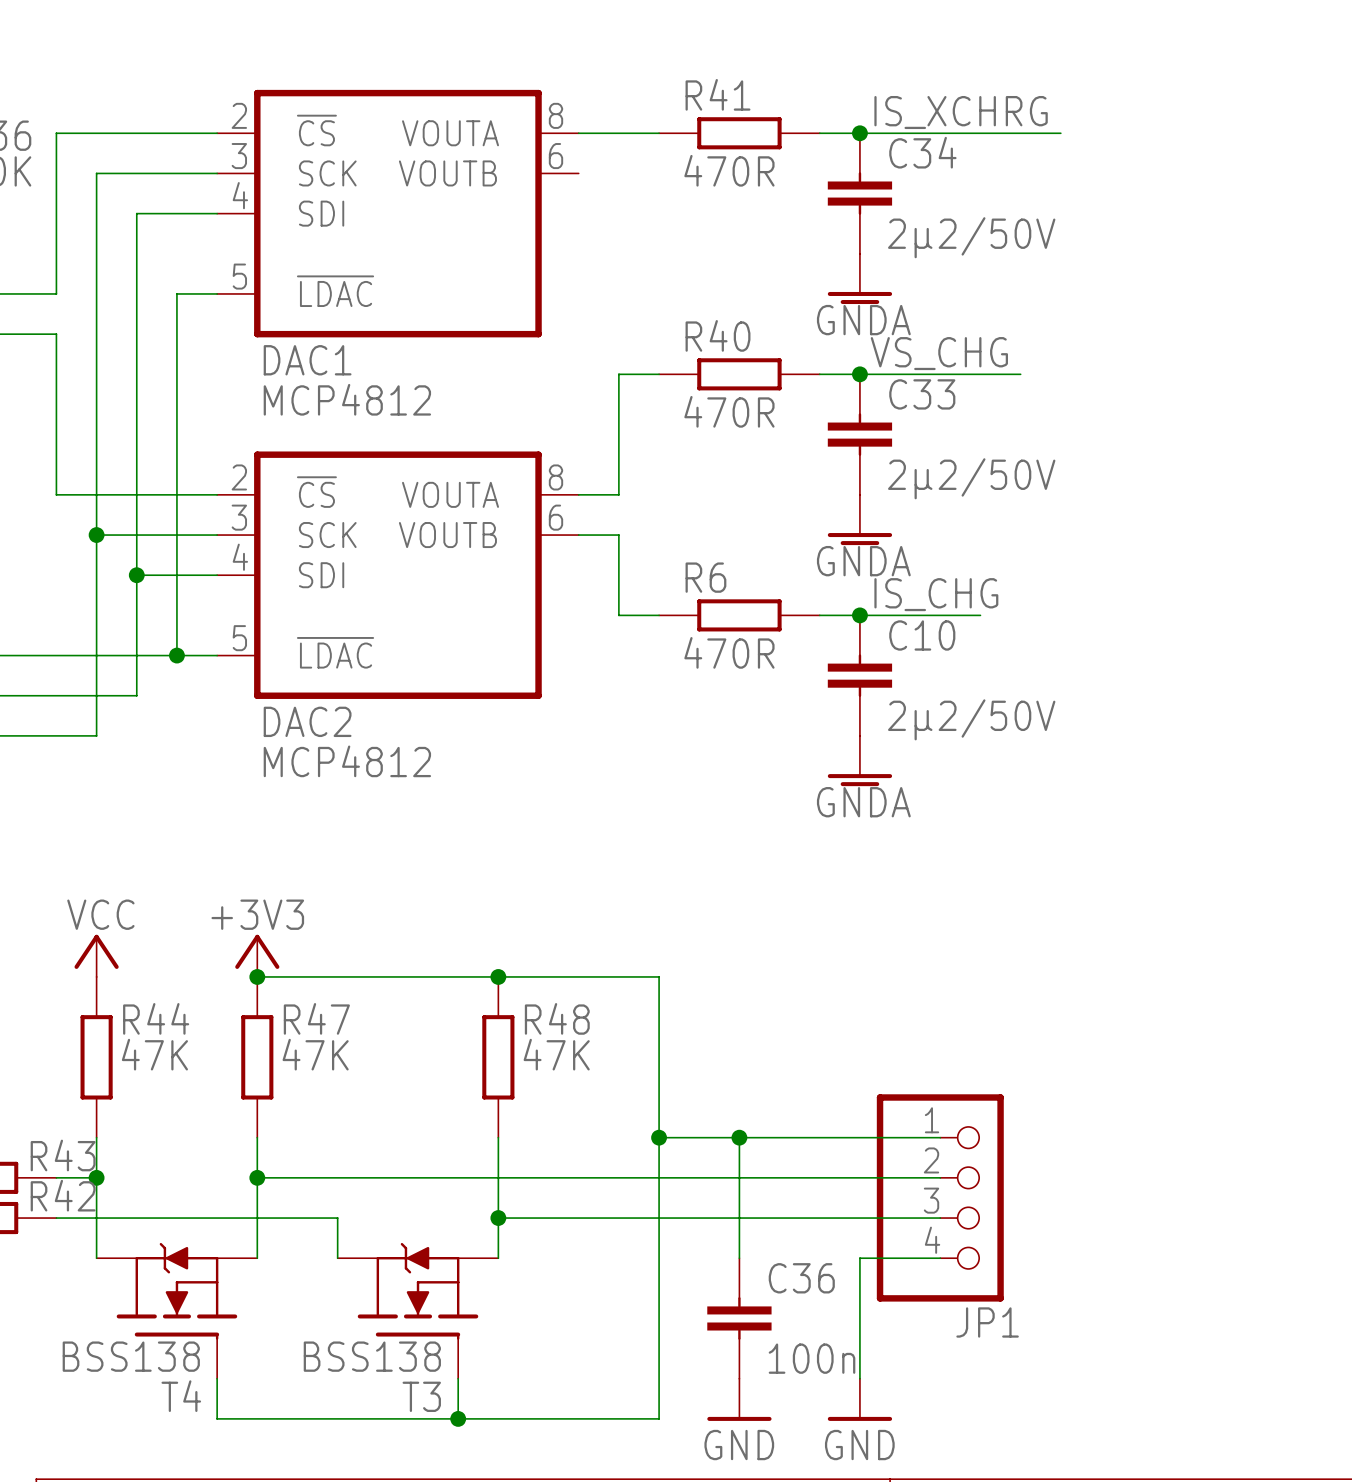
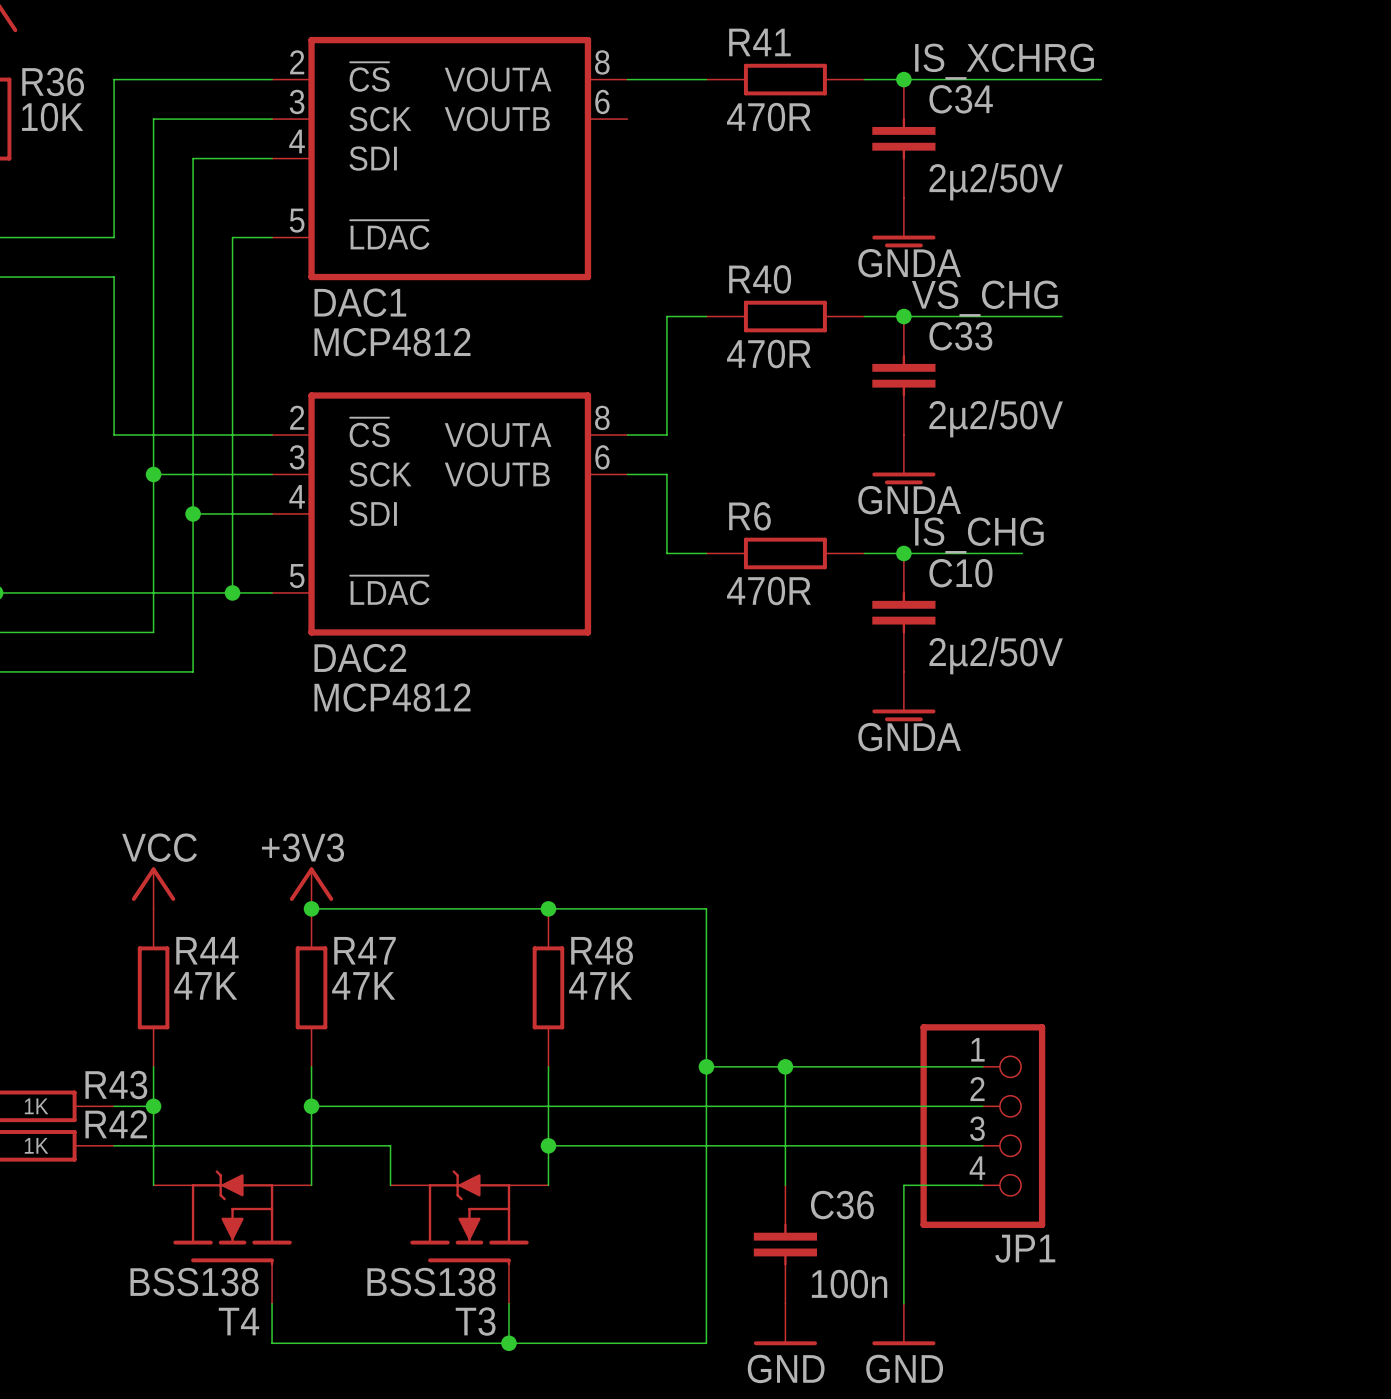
wire: (136, 695) (96, 695) (96, 735) -> (193, 632) (193, 671) (153, 671)

